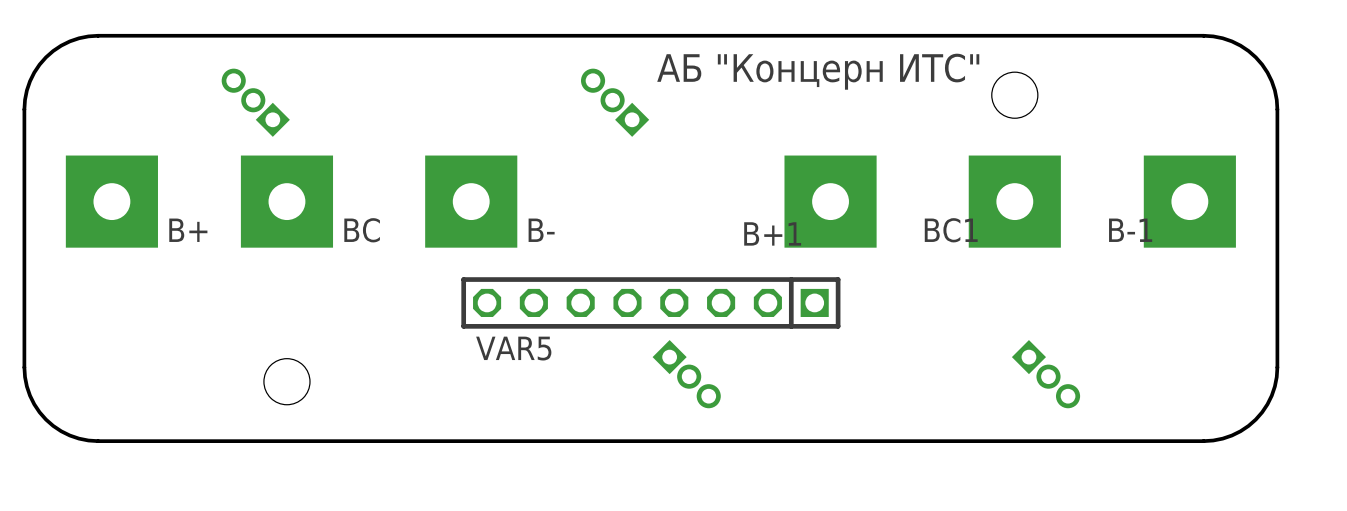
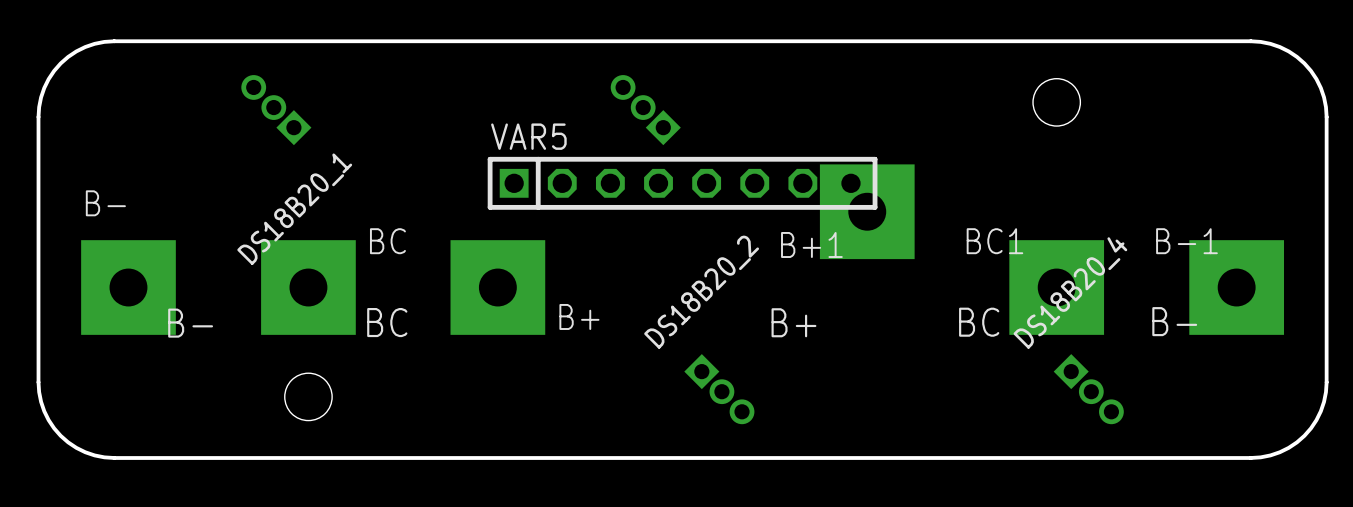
text: АБ "Концерн ИТС" (818, 71) -> none
DS18B20_1 name: none -> DS18B20_1 (294, 209)
B+ position: (111, 201) -> (497, 287)
BC position: (286, 201) -> (308, 287)
B- position: (471, 201) -> (128, 287)
BC1 position: (1014, 201) -> (1056, 287)
B-1 position: (1189, 201) -> (1236, 287)
B- name position: B- (541, 230) -> B- (105, 203)
DS18B20_2 name: none -> DS18B20_2 (701, 292)
DS18B20_4 name: none -> DS18B20_4 (1070, 292)
VAR5 rotation: 0° (650, 302) -> 180° (682, 183)
text: none -> B- (1174, 321)
text: none -> B- (190, 323)
text: none -> BC (387, 322)
text: none -> B+ (793, 322)
text: none -> BC (979, 322)
VAR5 name position: VAR5 (513, 348) -> VAR5 (528, 136)

